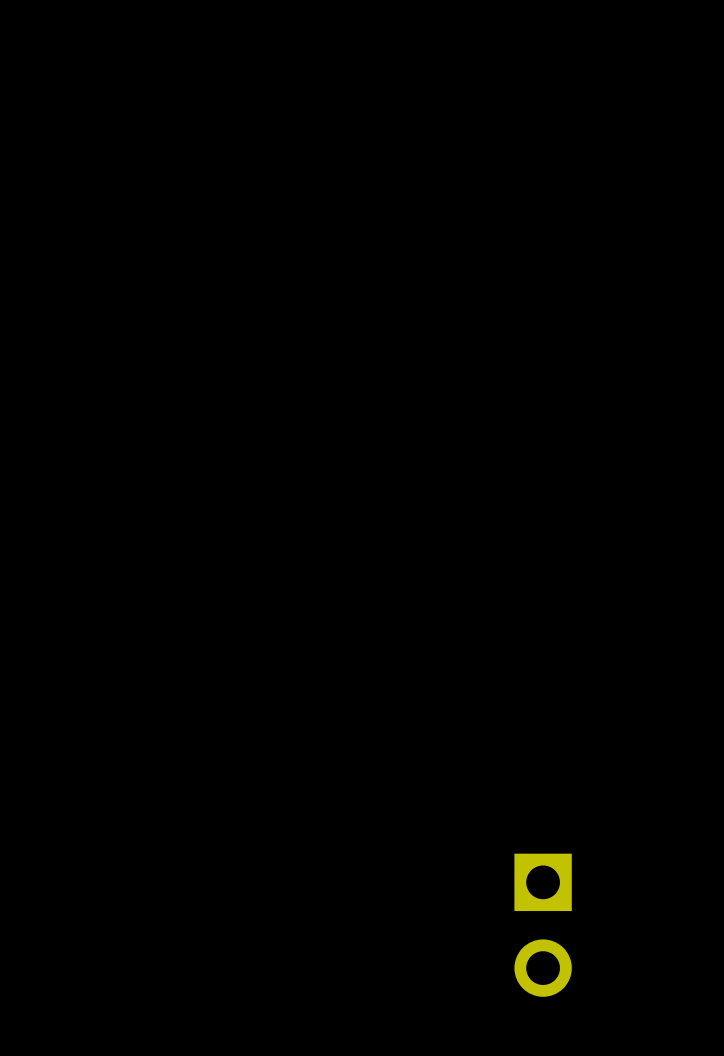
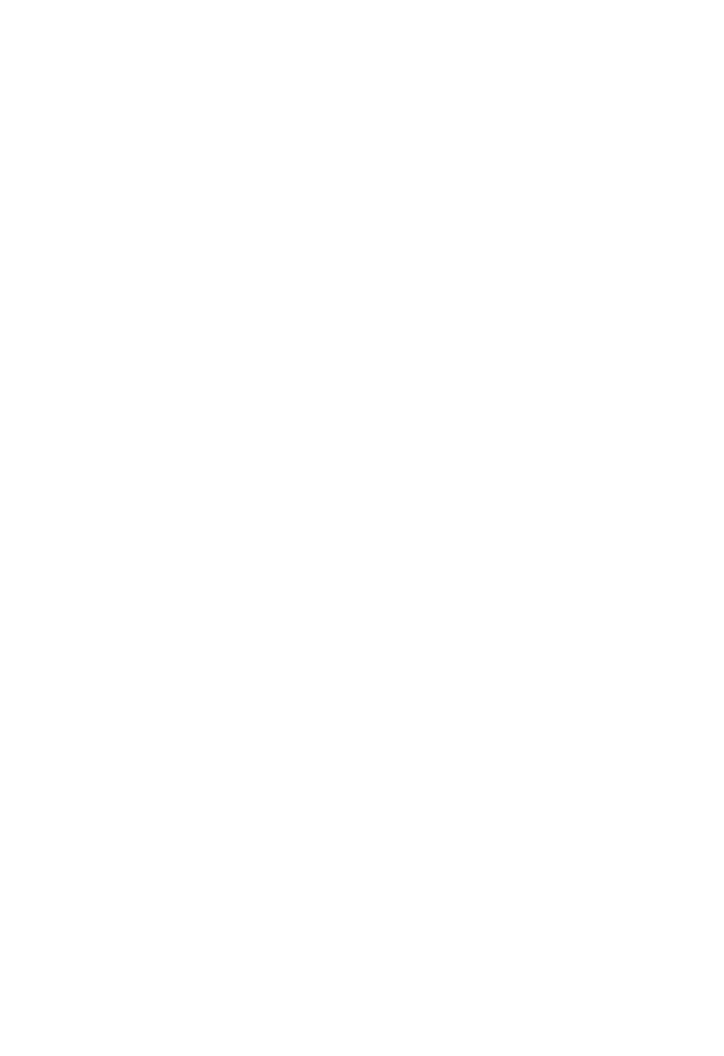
part: (543, 925) -> none

